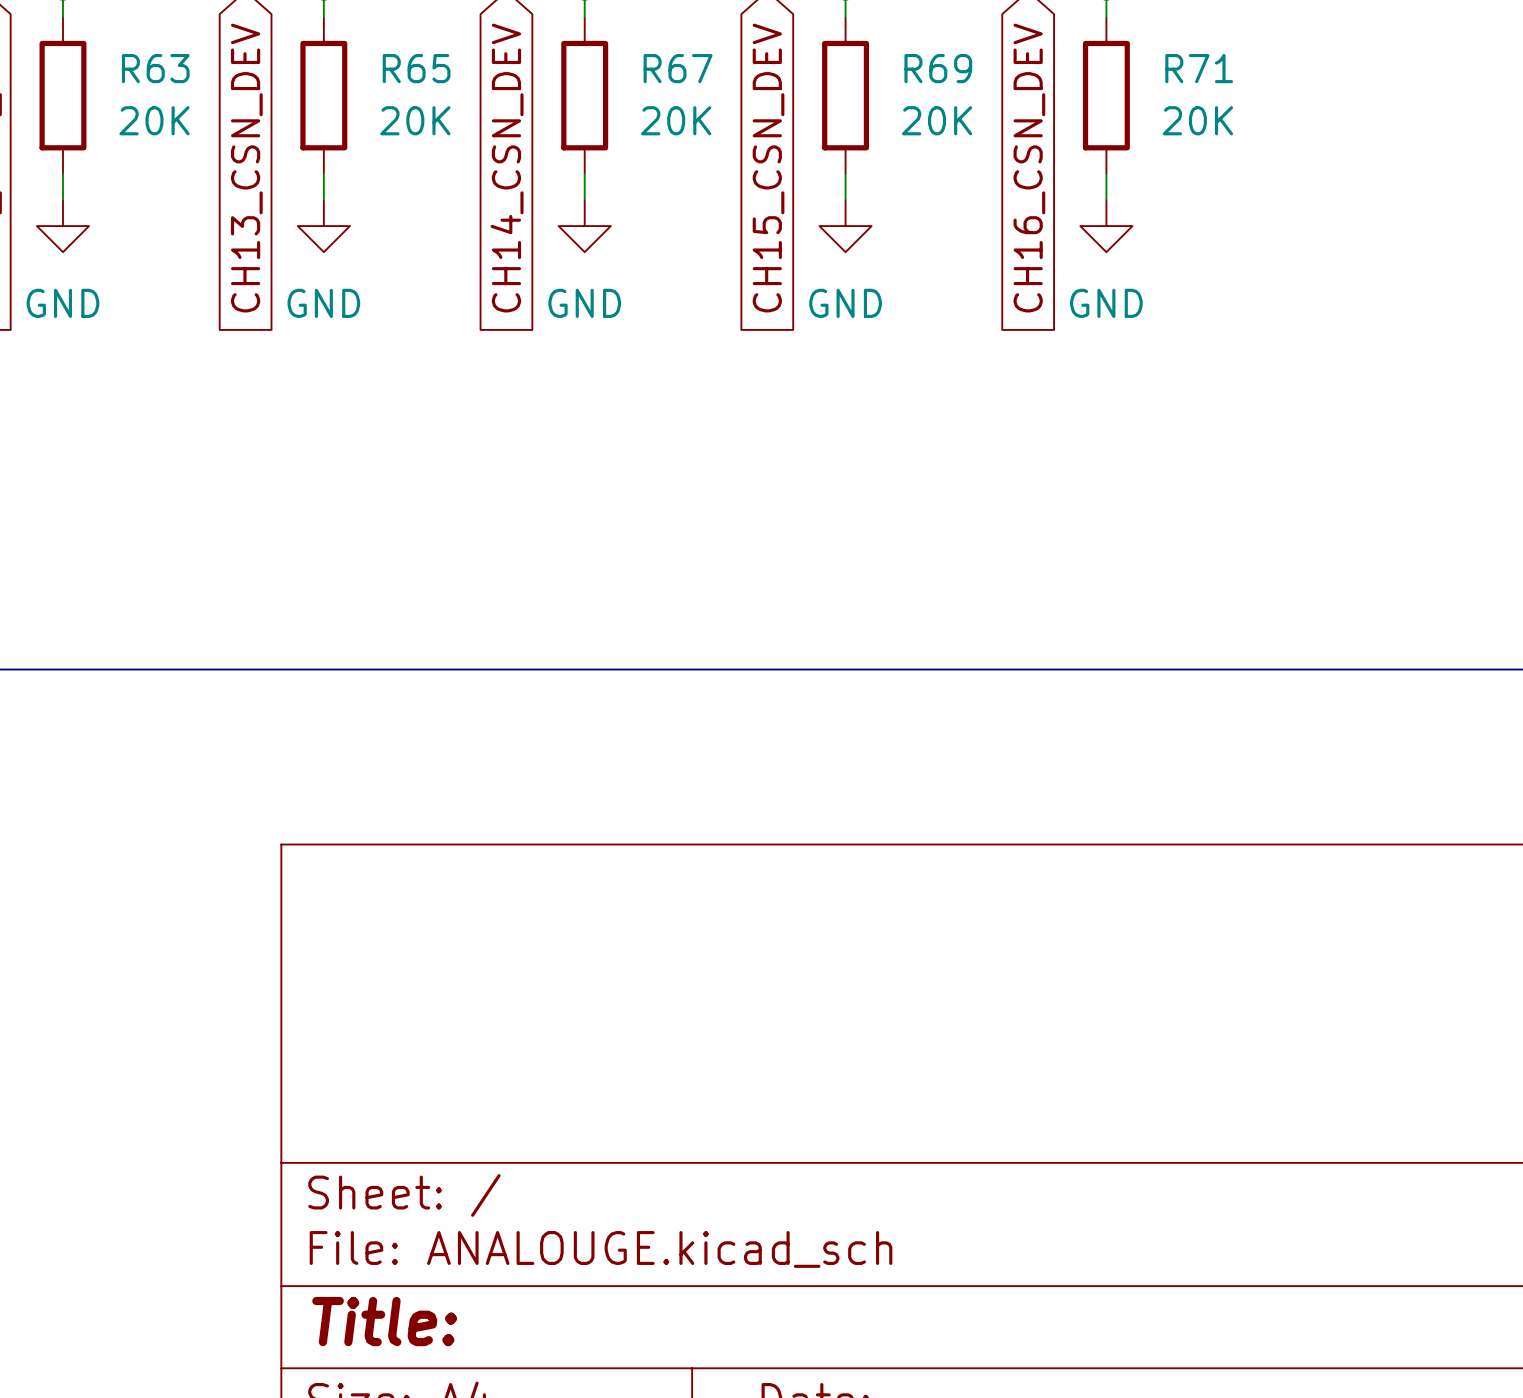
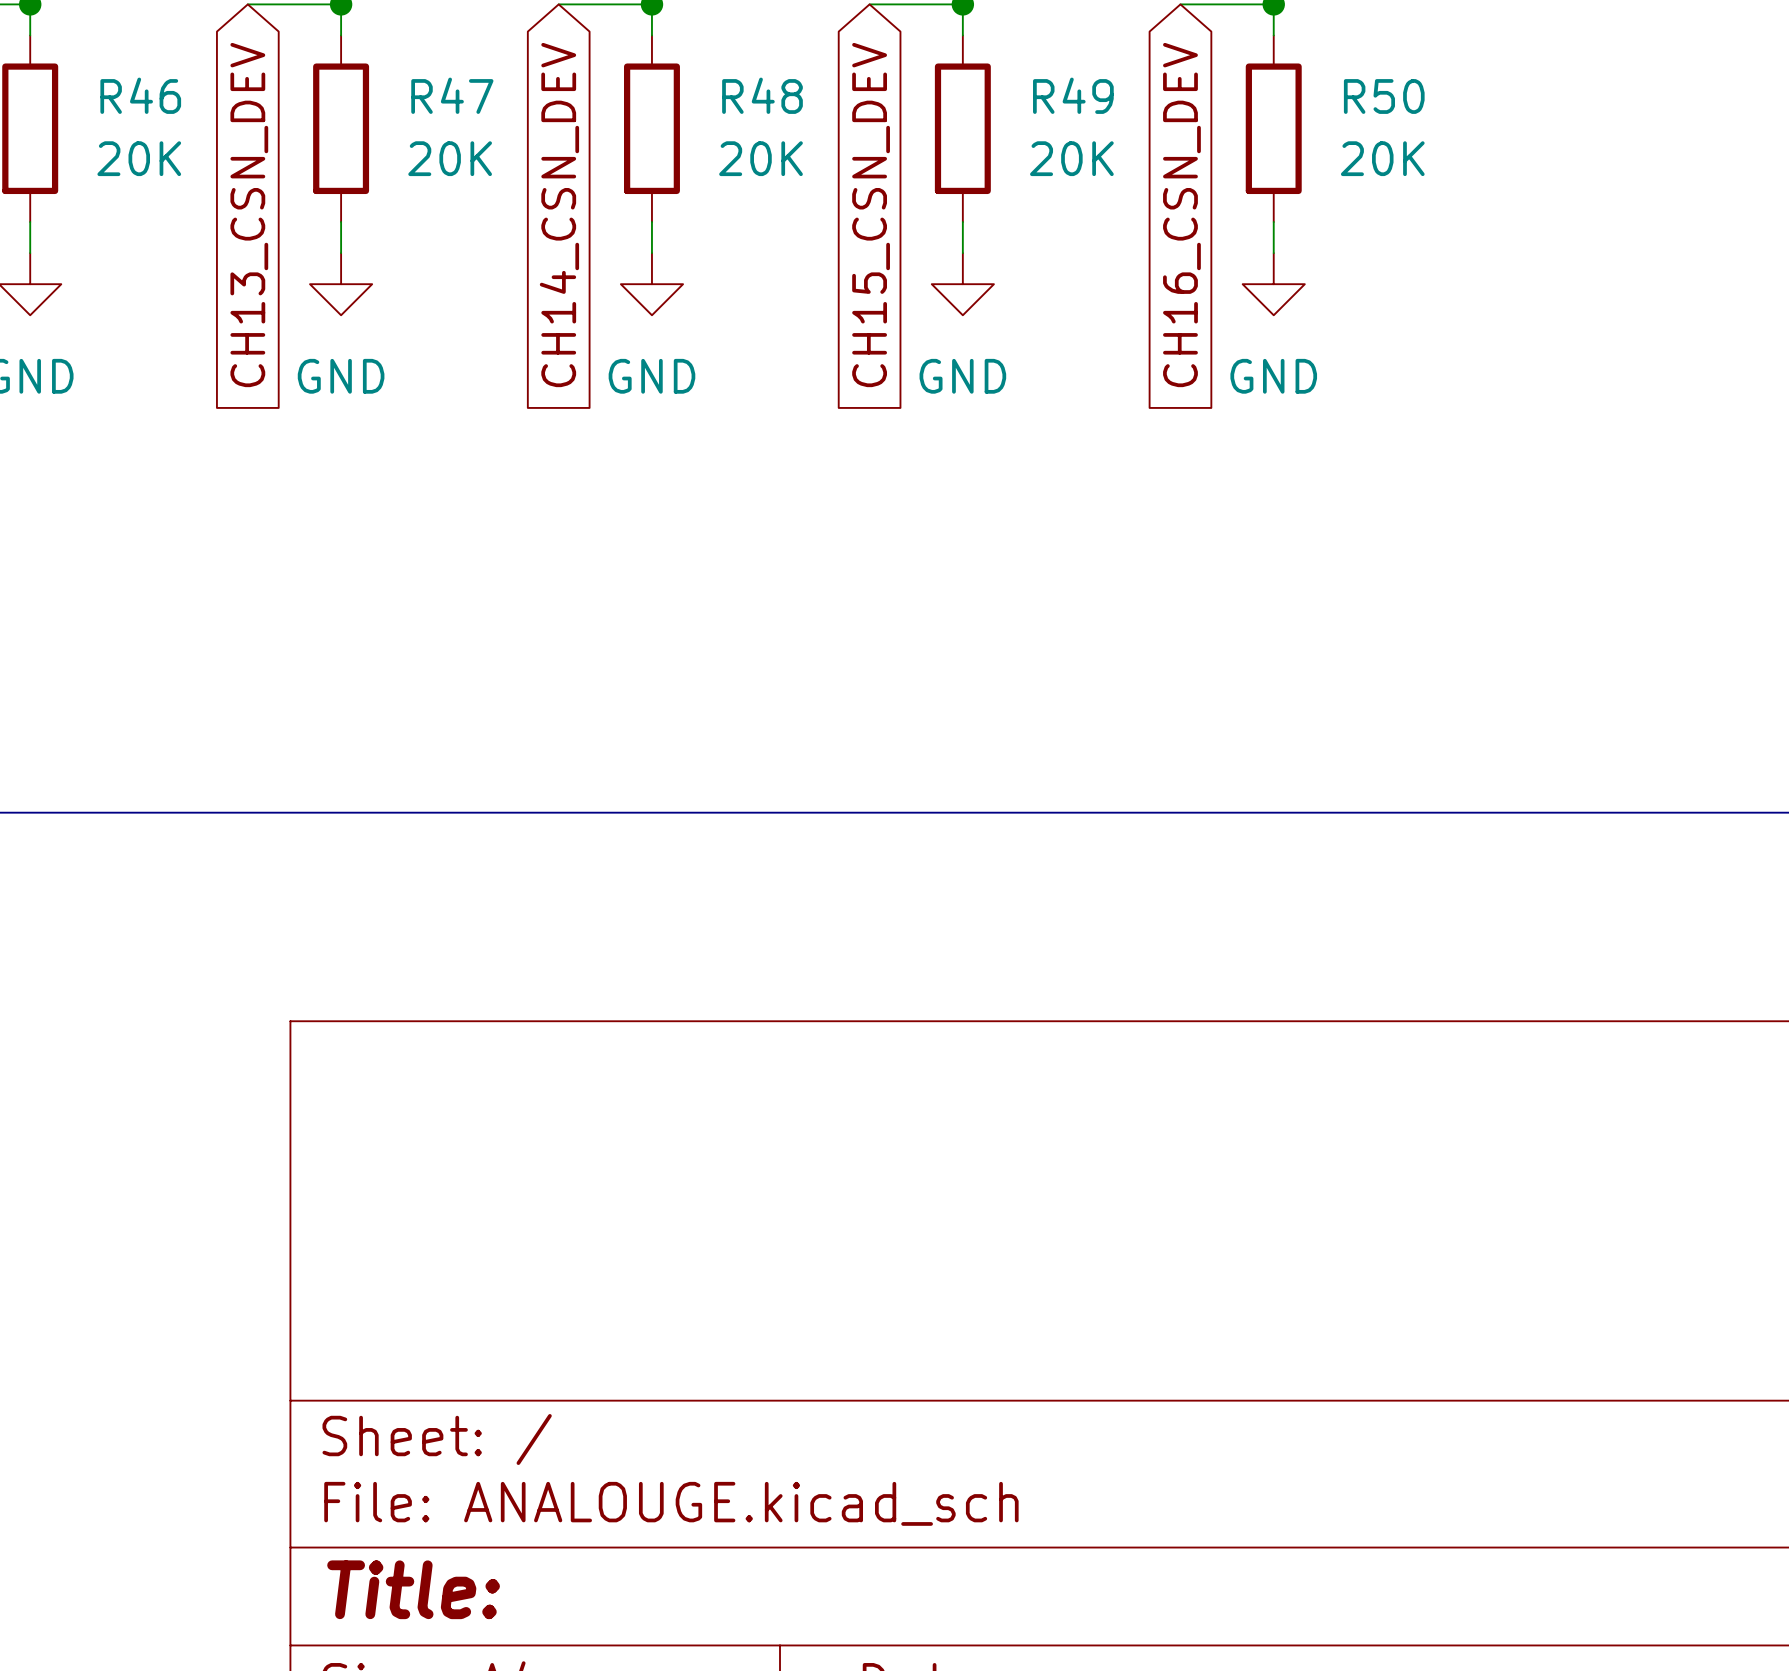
R63 name: R63 (155, 68) -> R46 (140, 95)
R65 name: R65 (416, 68) -> R47 (452, 95)
R67 name: R67 (678, 68) -> R48 (762, 95)
R69 name: R69 (938, 68) -> R49 (1073, 95)
R71 name: R71 (1199, 68) -> R50 (1384, 96)

